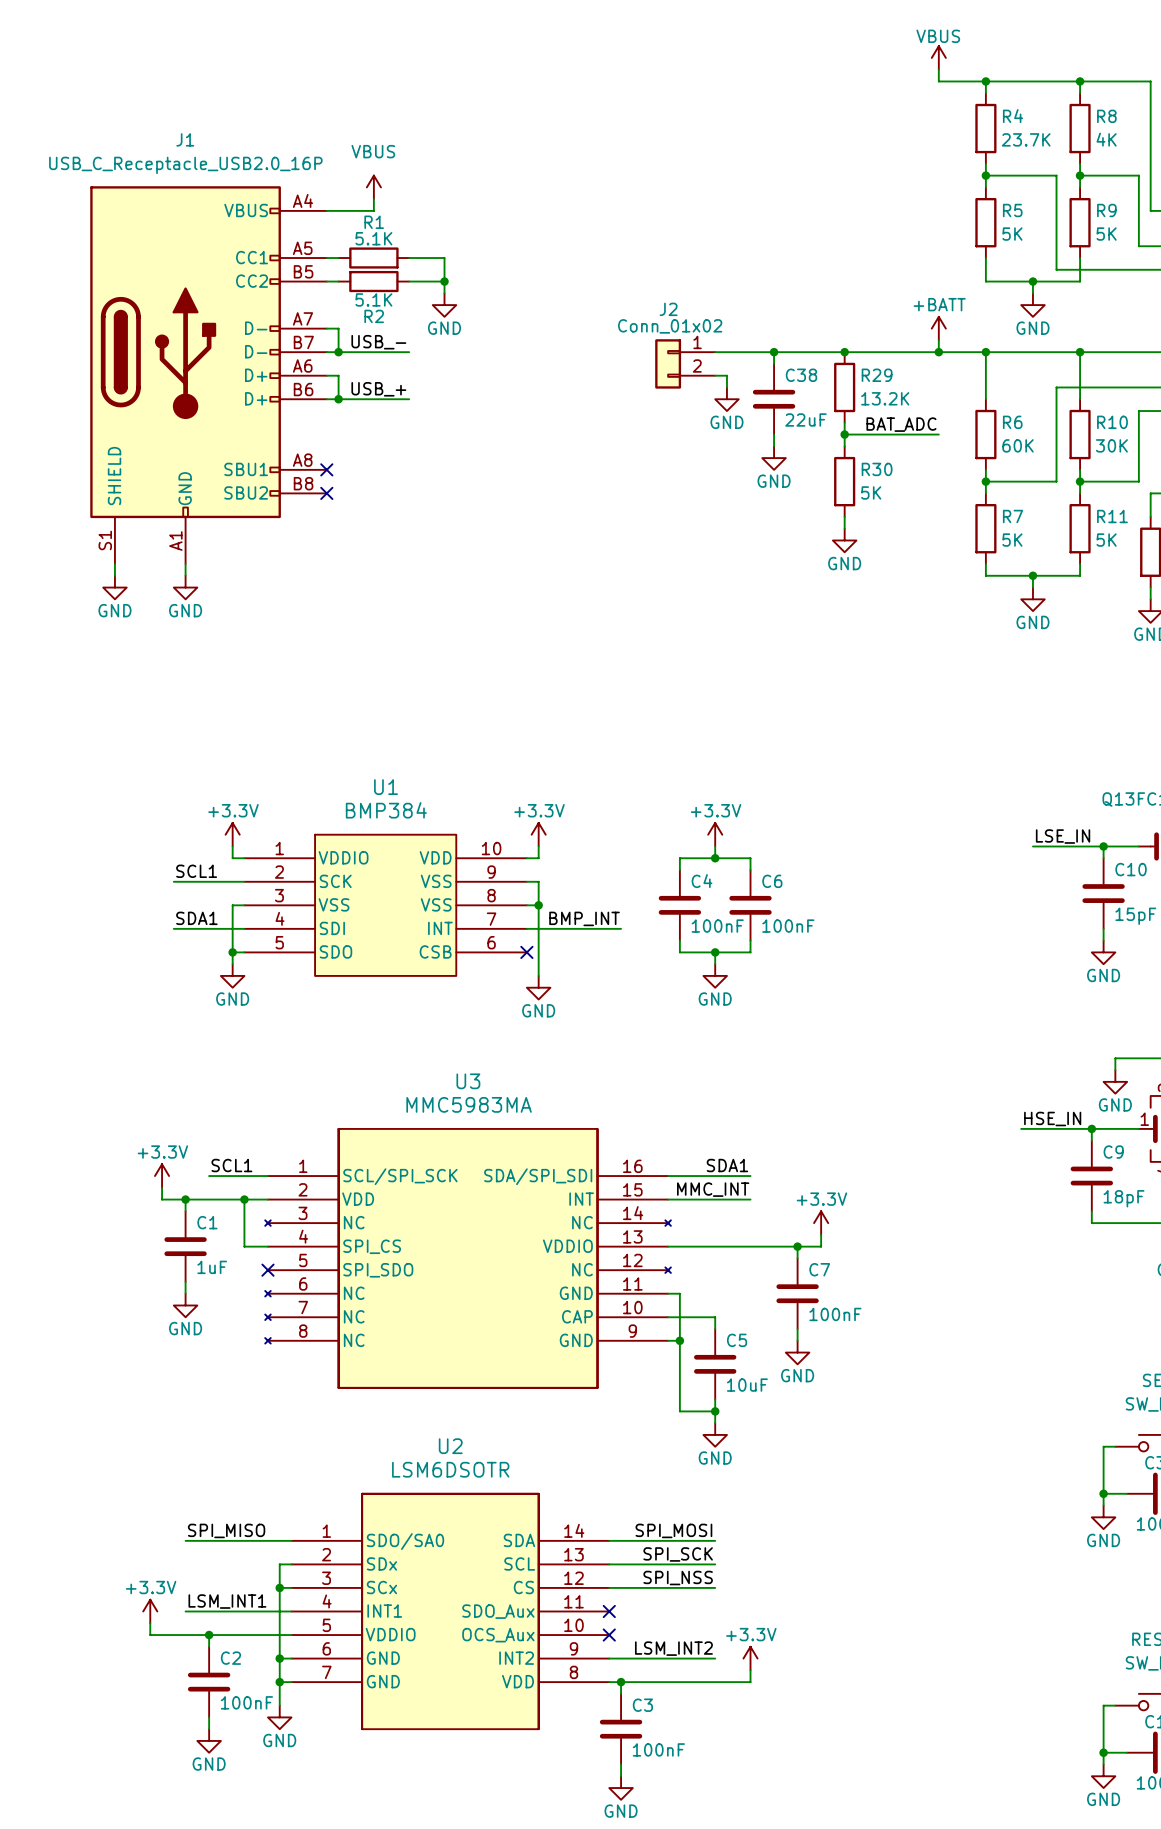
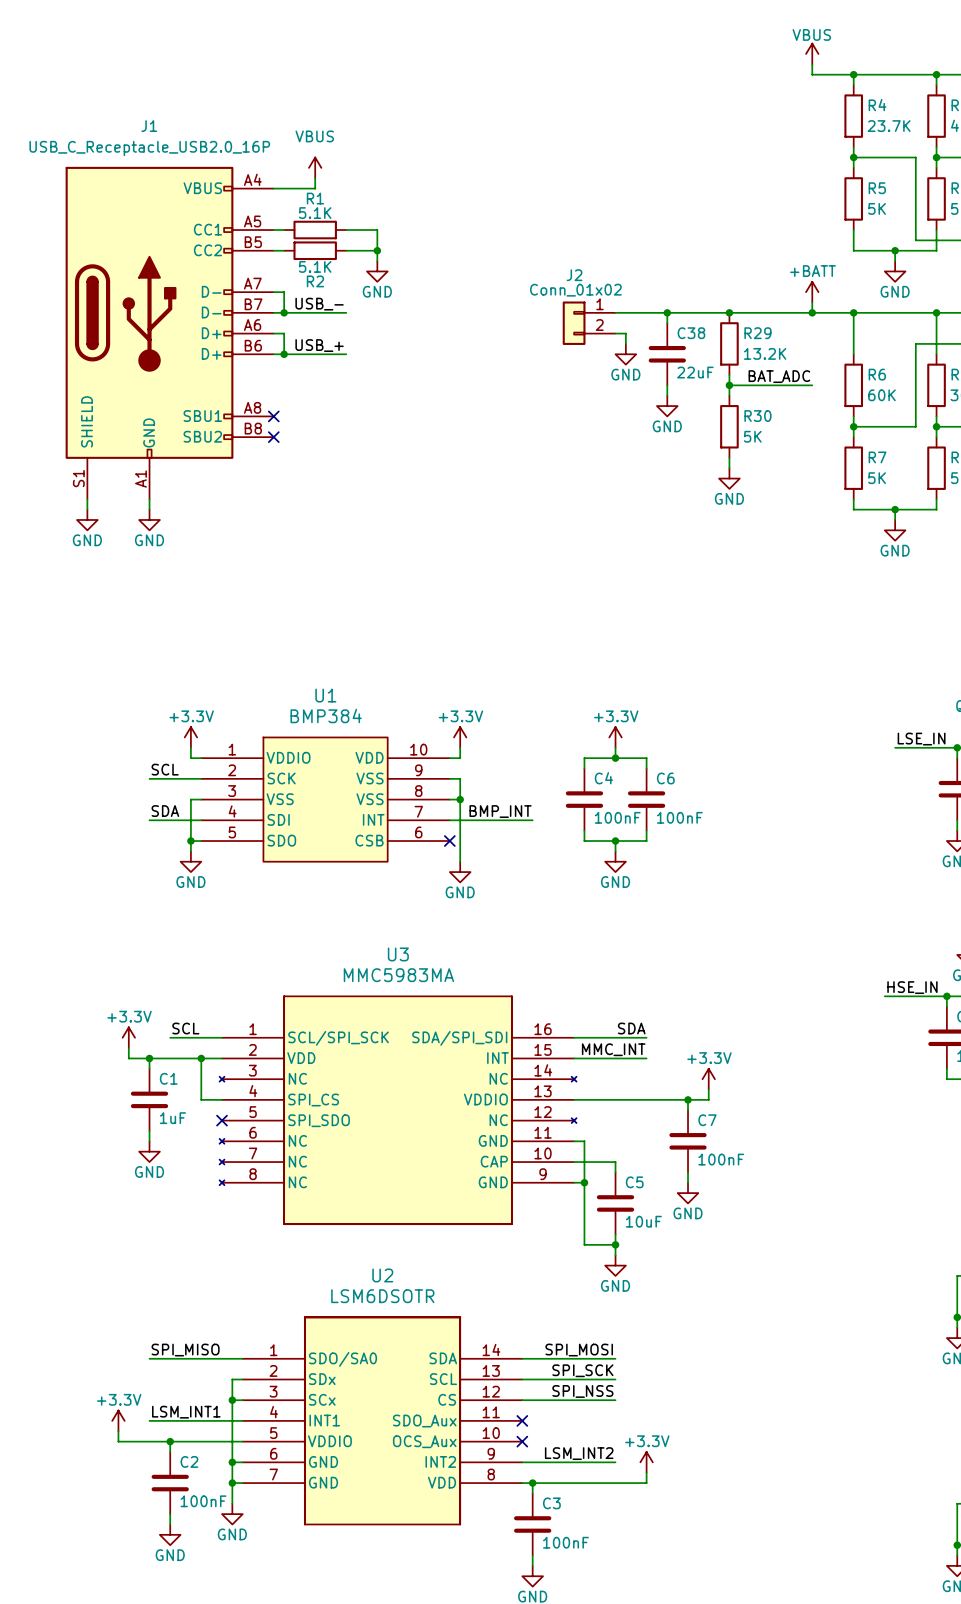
label: SCL1 (196, 871) -> SCL (165, 769)
wire: (173, 881) (185, 881) -> none
label: SDA1 (196, 918) -> SDA (165, 811)
wire: (173, 928) (185, 928) -> none
label: SCL1 (231, 1165) -> SCL (185, 1028)
label: SDA1 (727, 1165) -> SDA (631, 1028)

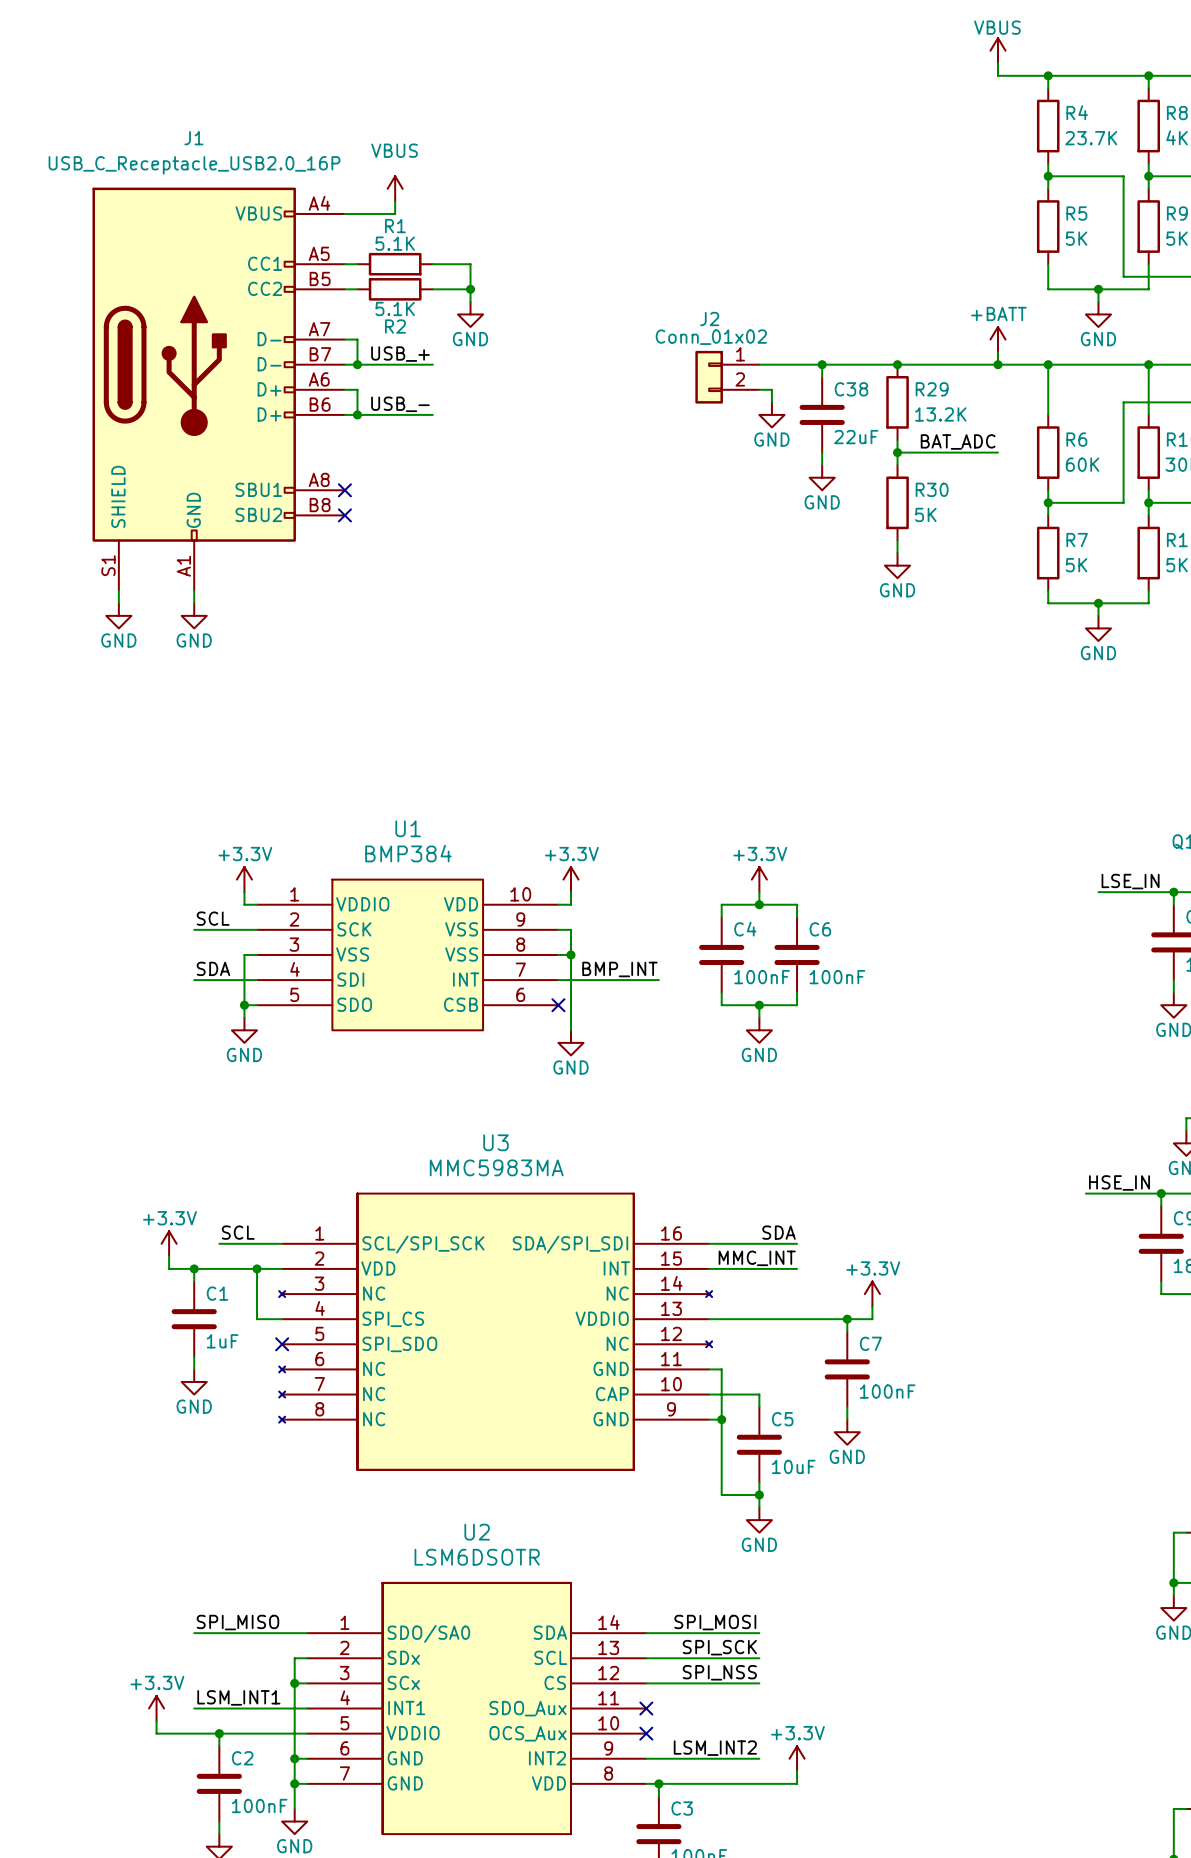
label: USB_- (319, 304) -> USB_+ (400, 354)
label: USB_+ (319, 345) -> USB_- (400, 404)

